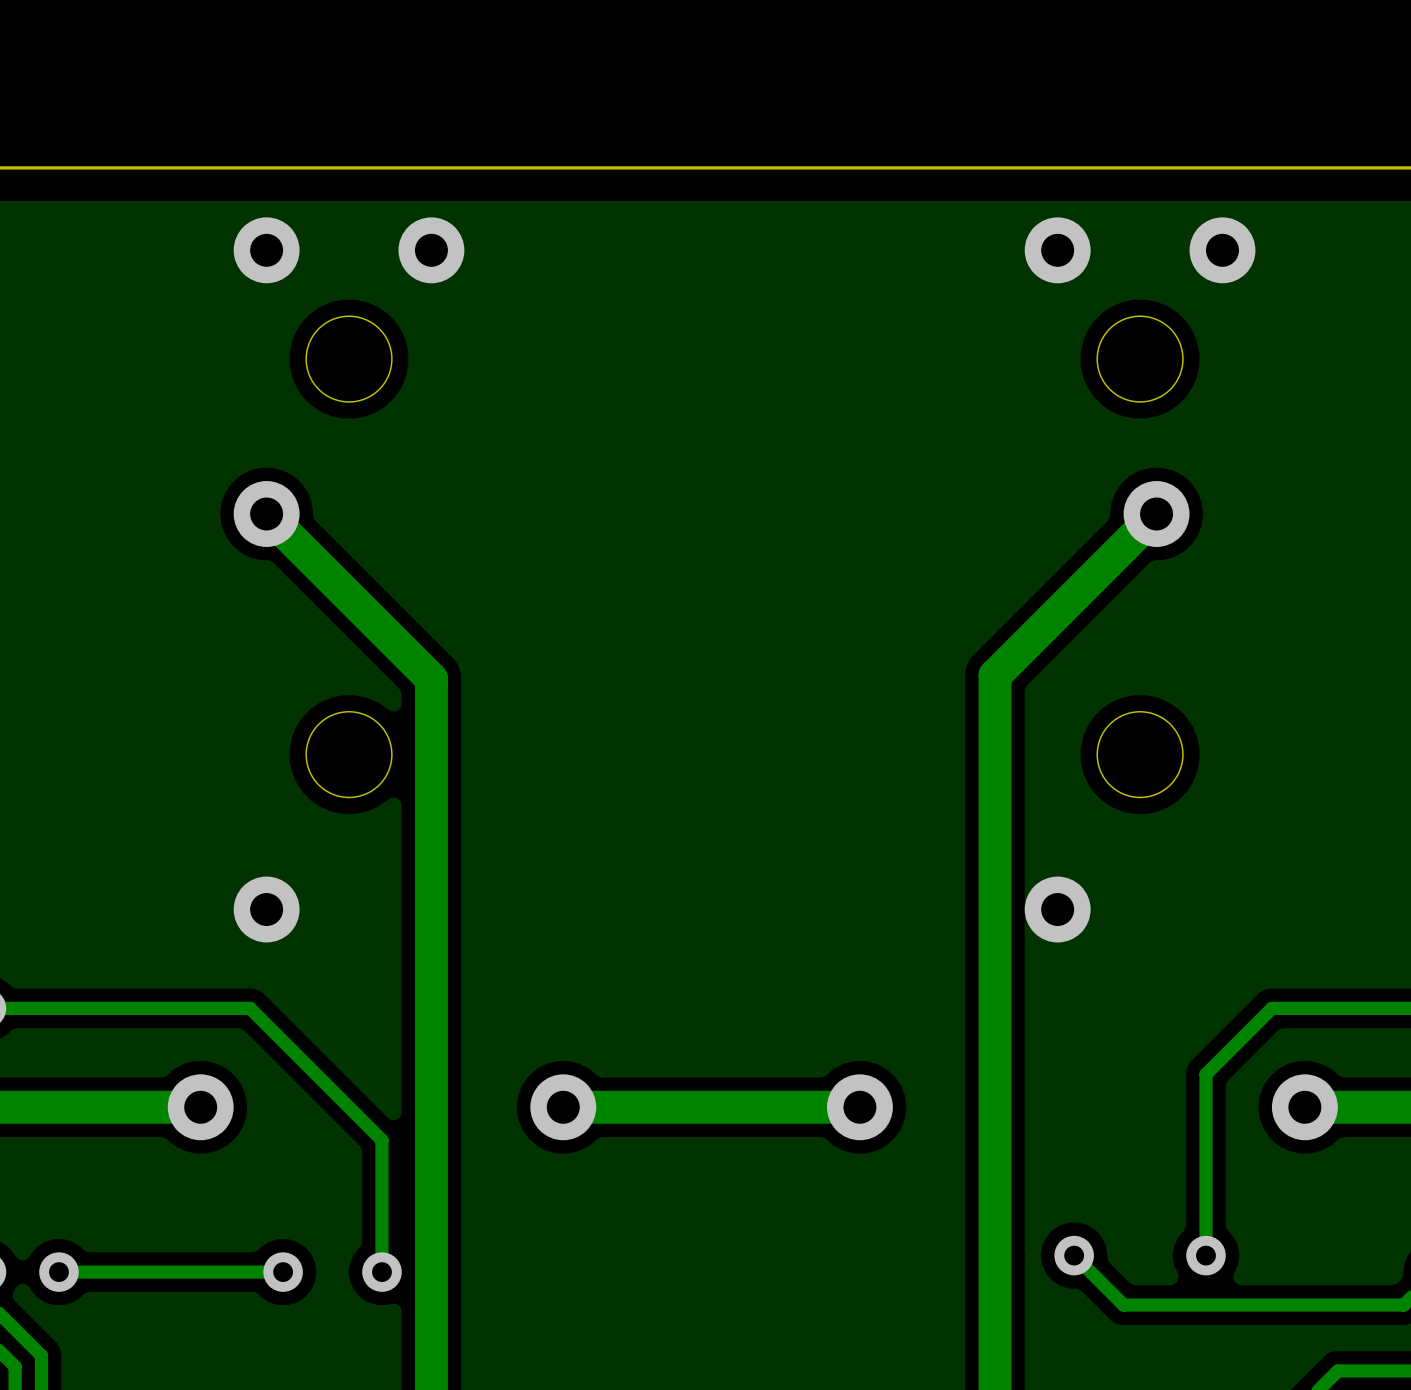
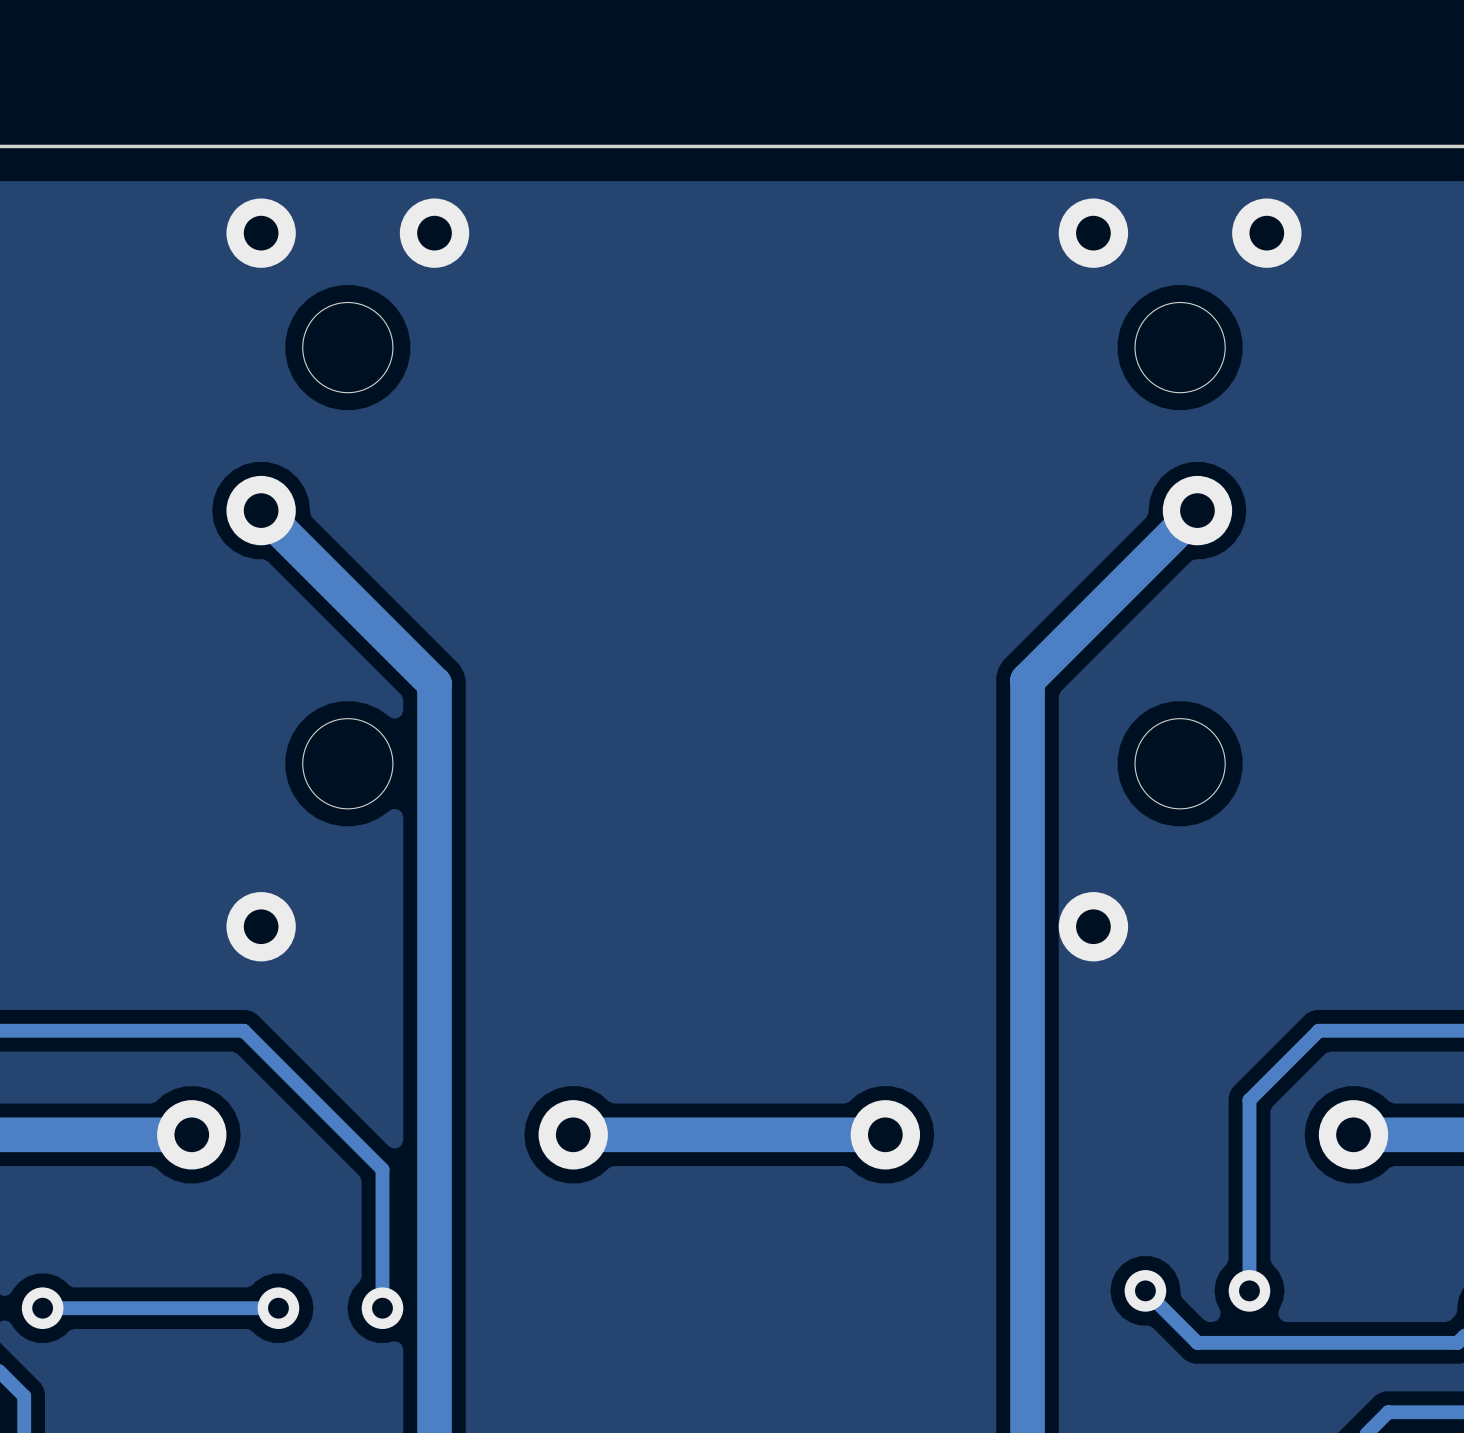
track: (1074, 1255) (1123, 1305) (1156, 1305) -> (1145, 1290) (1197, 1342)
via position: (1074, 1255) -> (1145, 1290)

